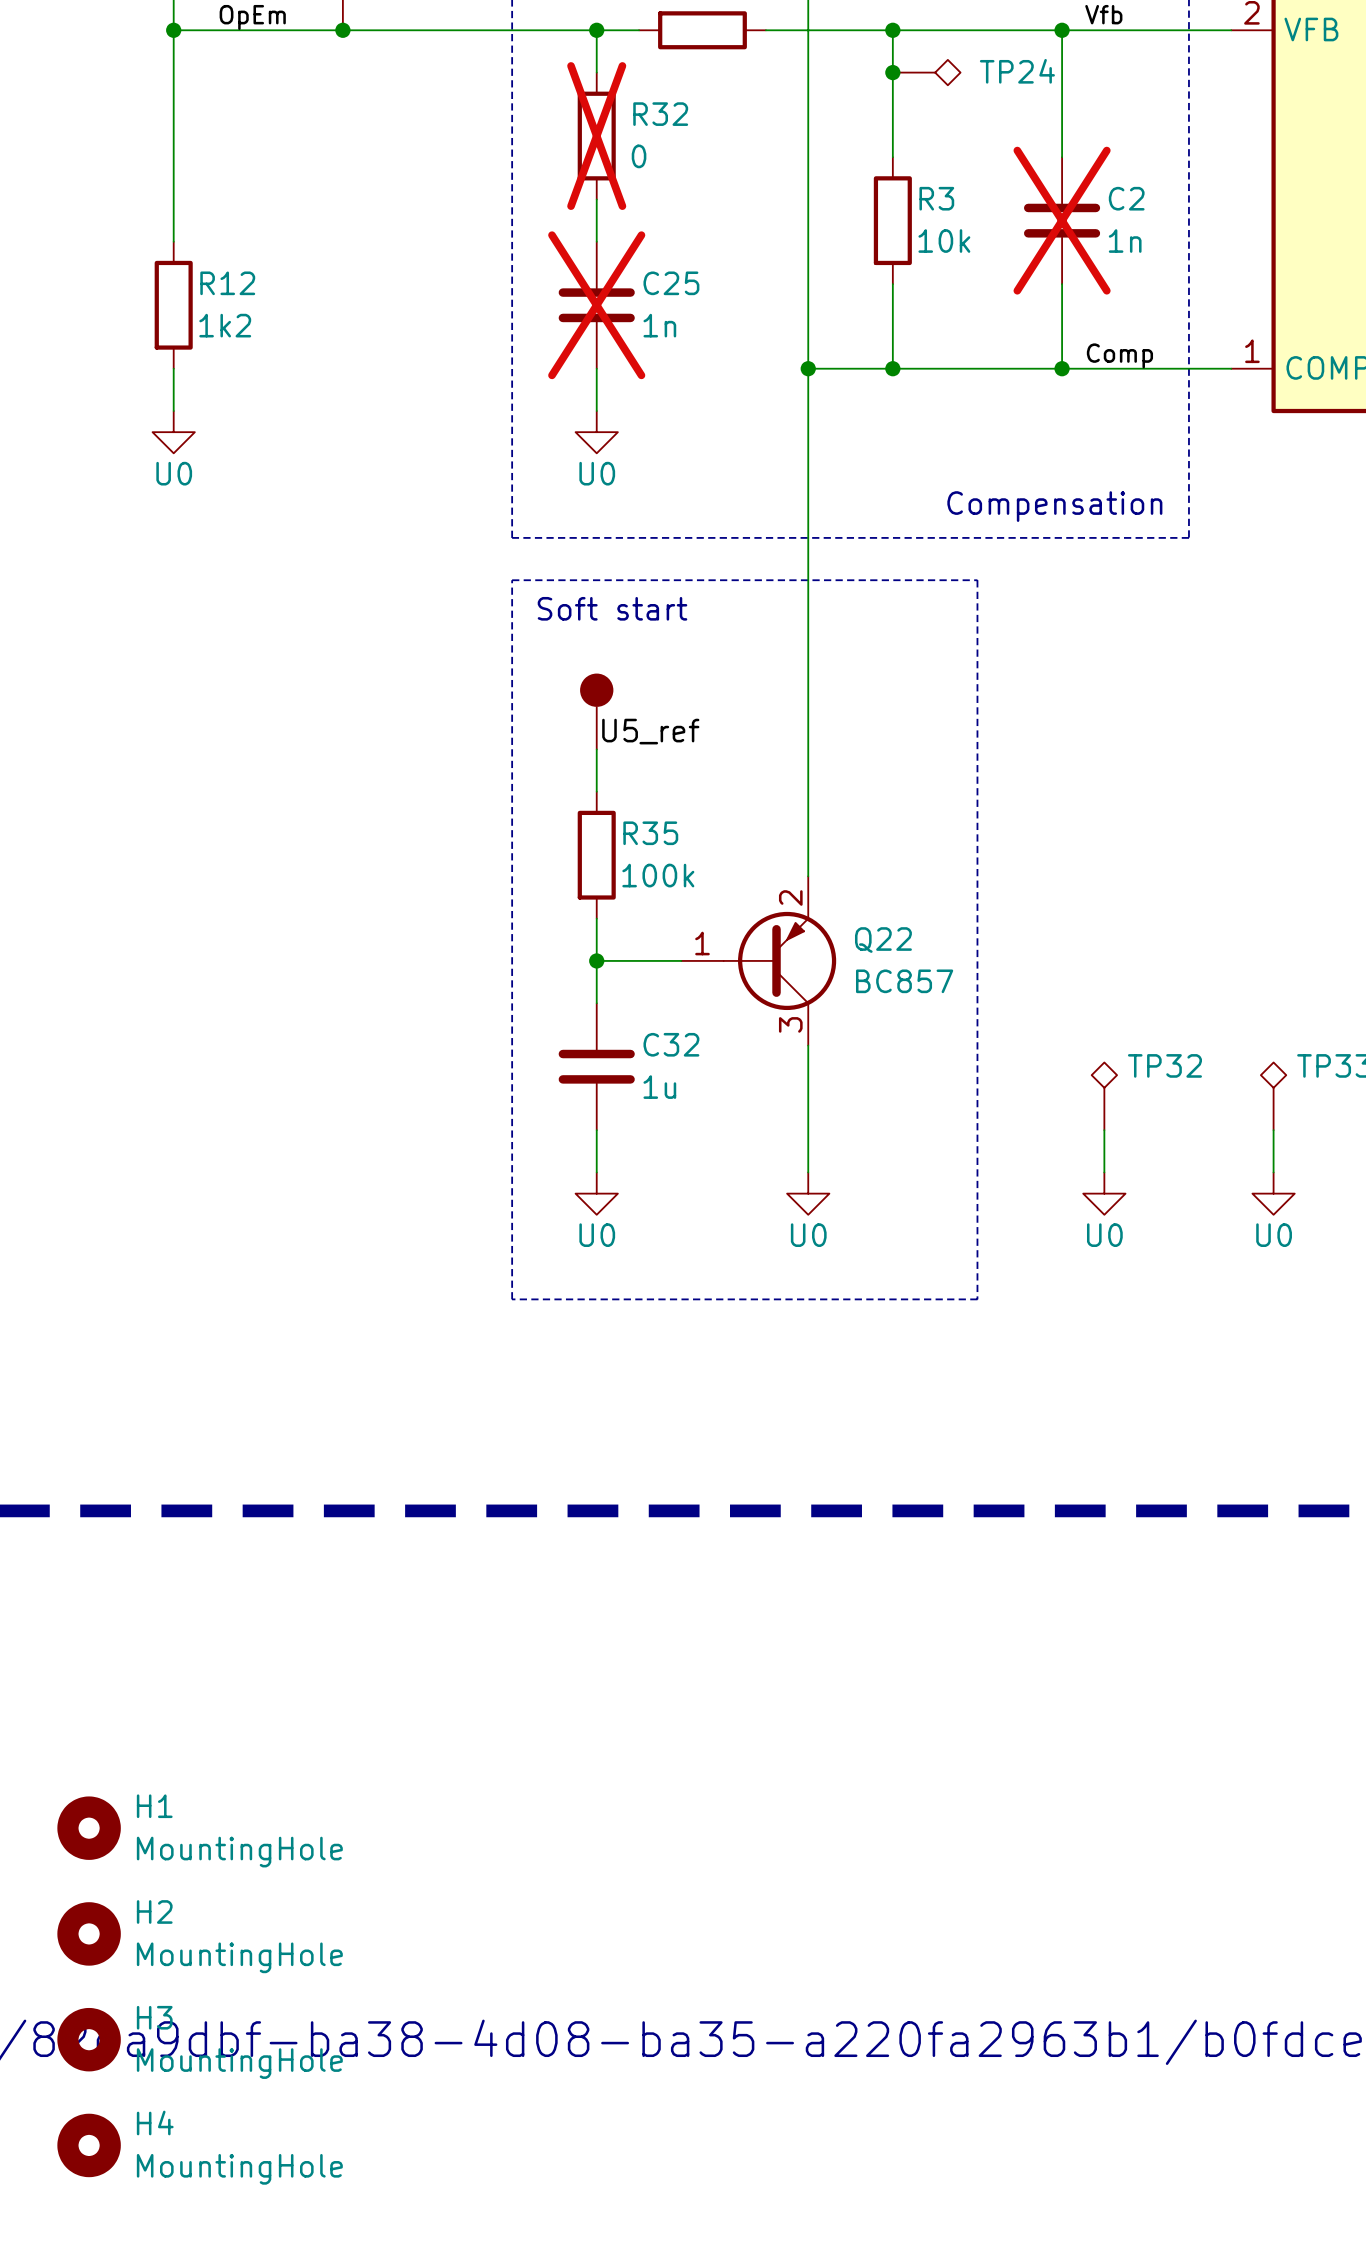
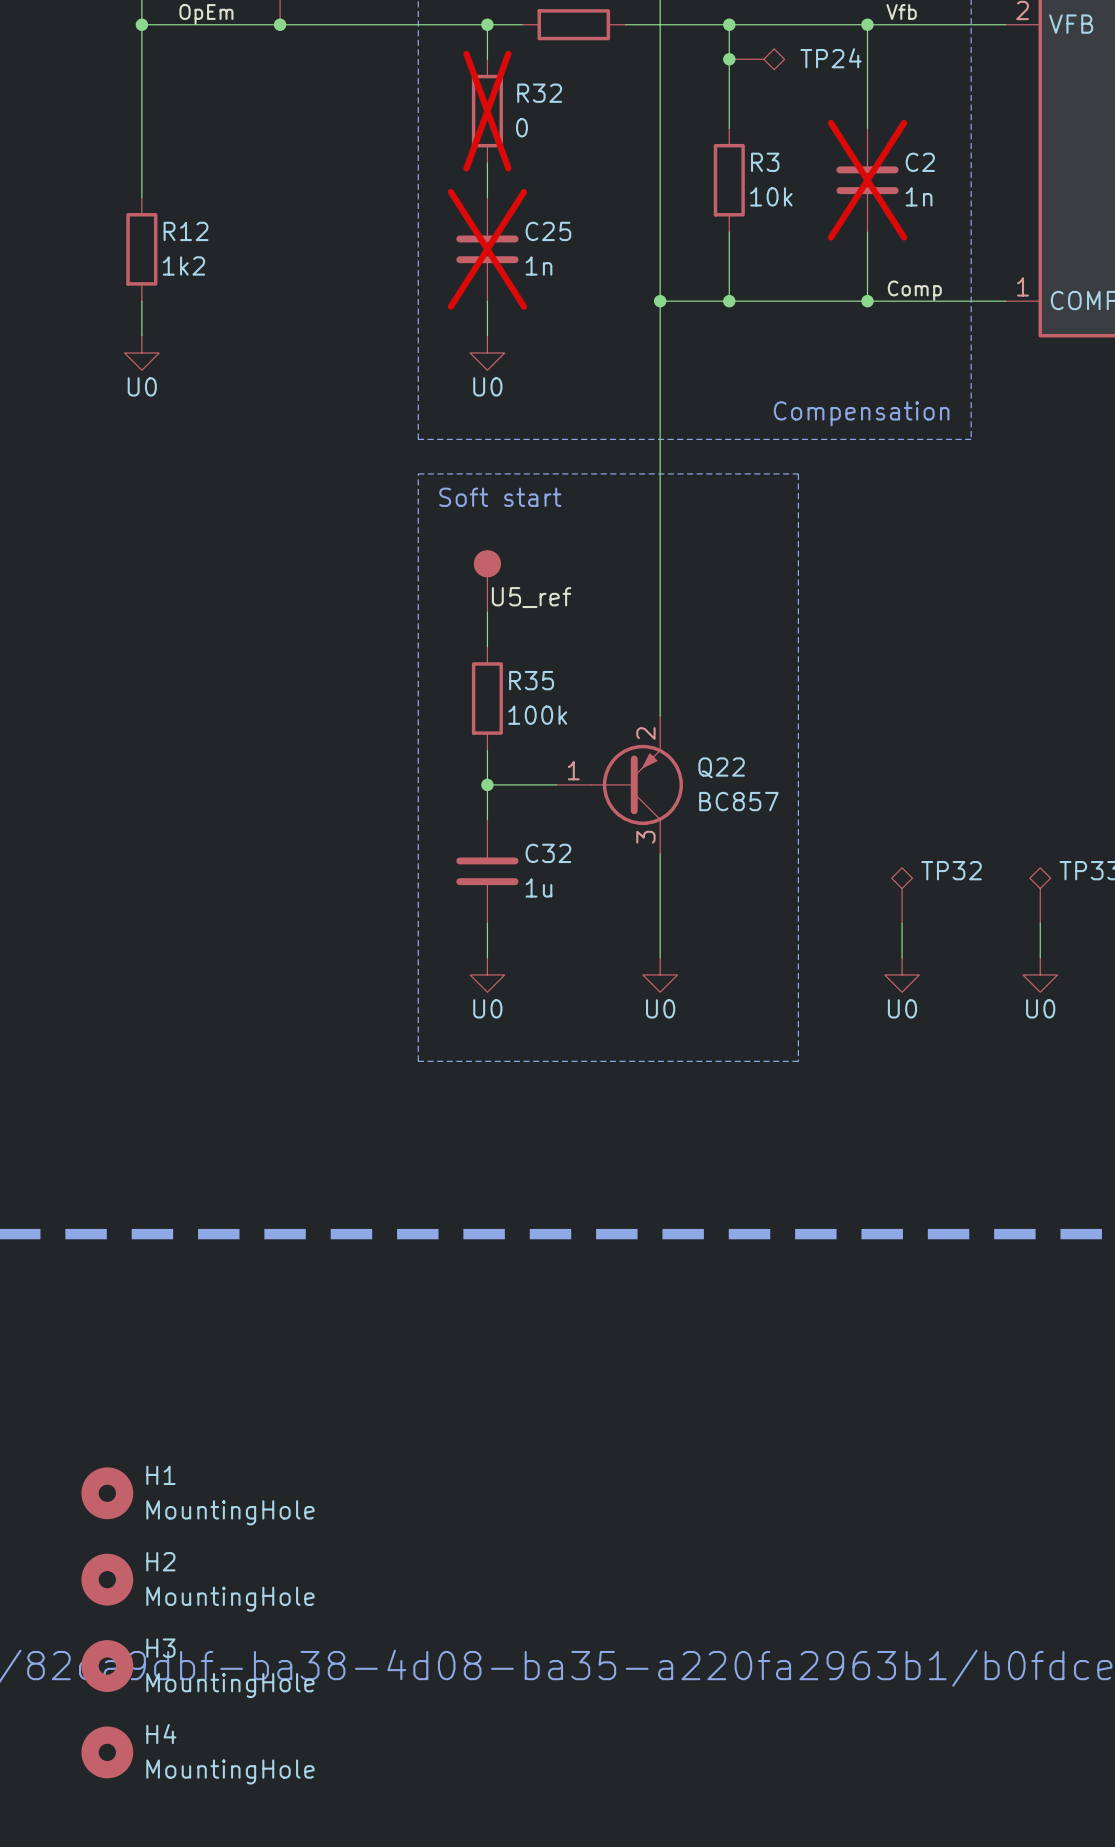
H1 position: (89, 1828) -> (107, 1493)
H2 position: (89, 1933) -> (107, 1579)
H3 position: (89, 2039) -> (107, 1666)
H4 position: (89, 2145) -> (107, 1752)

